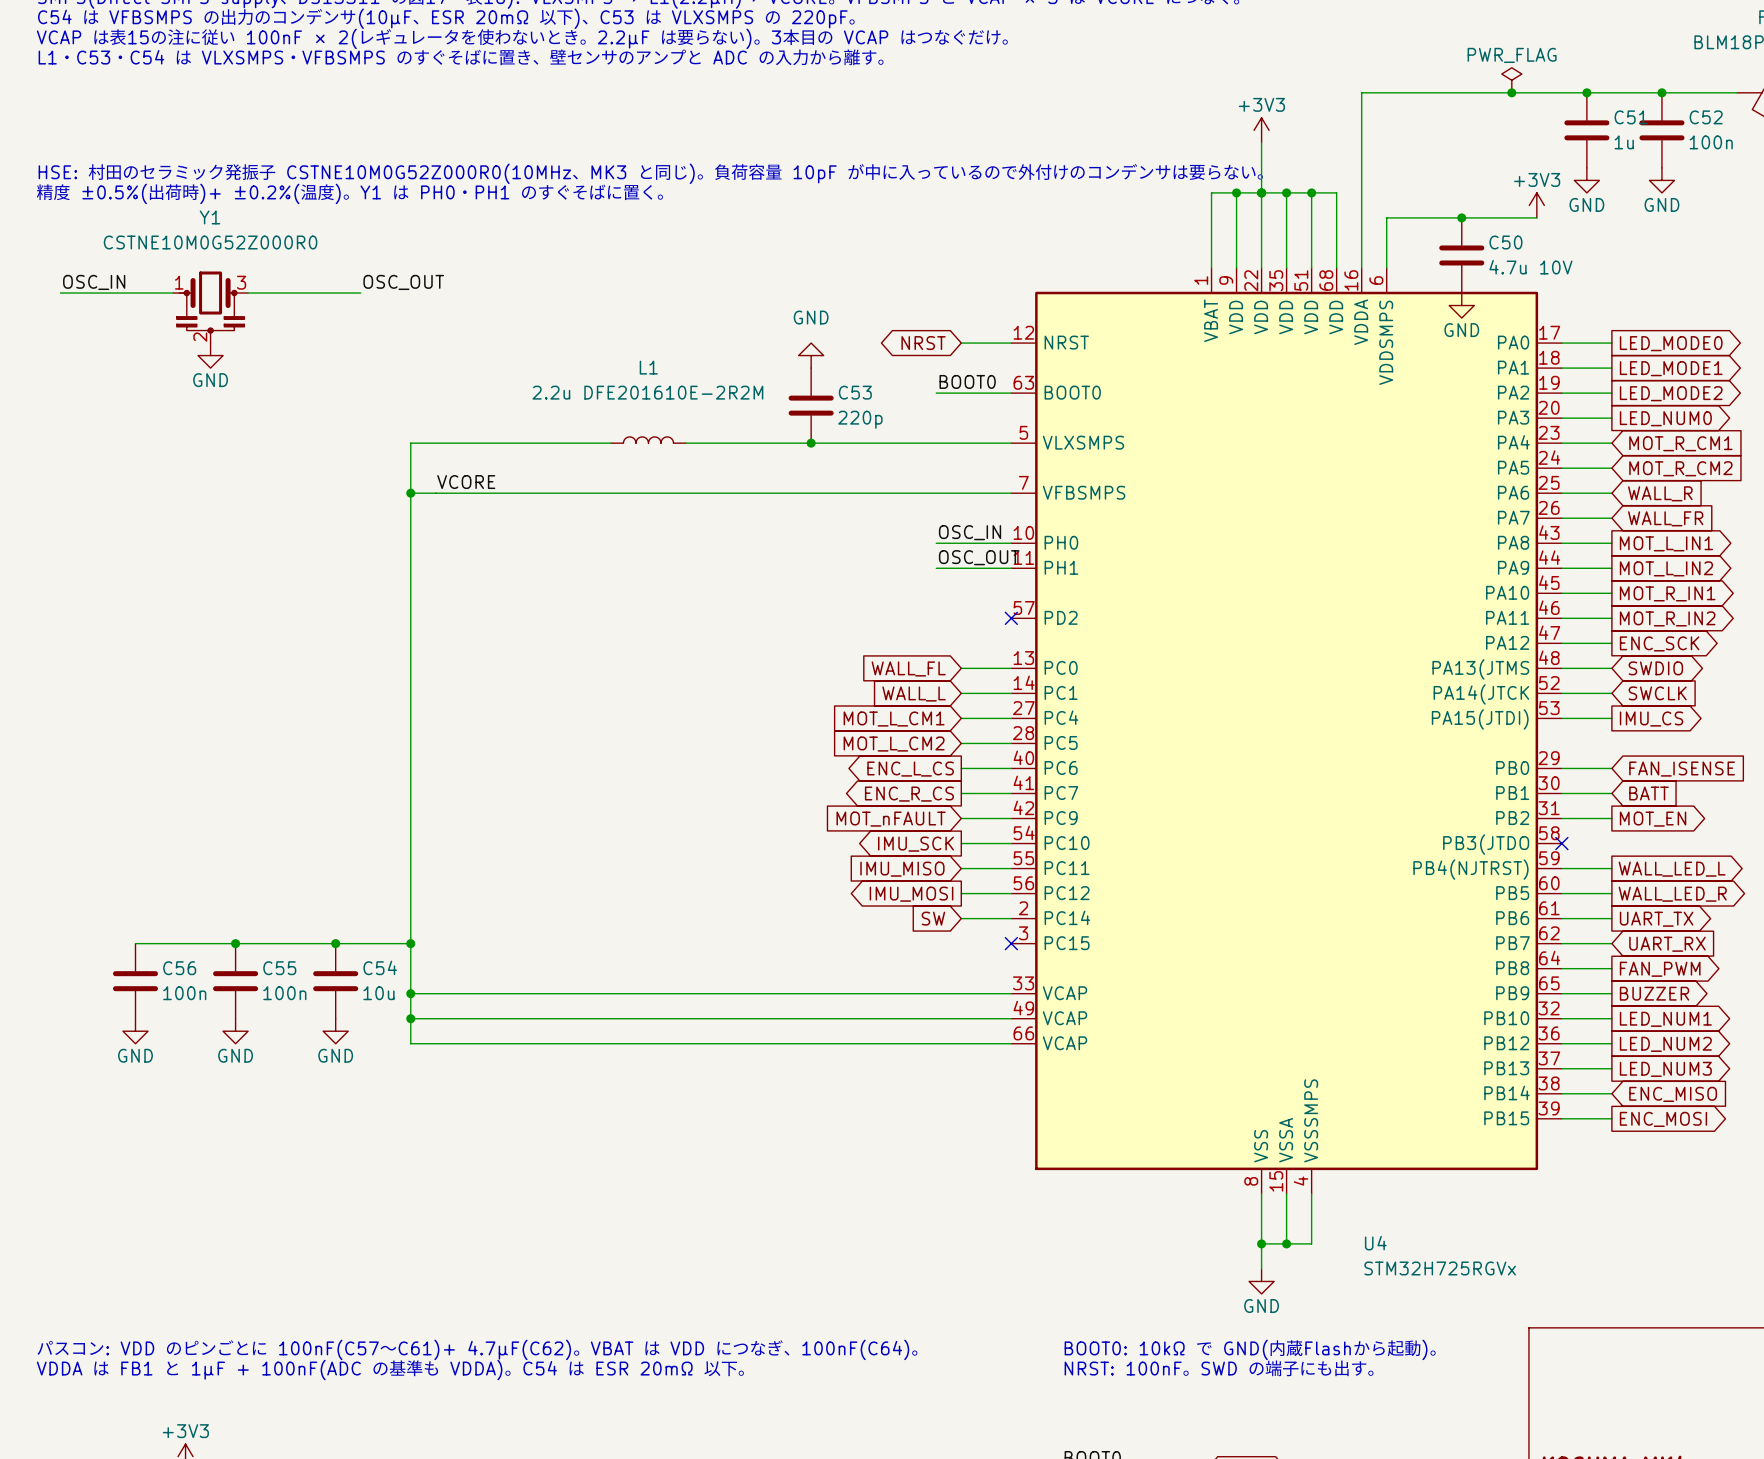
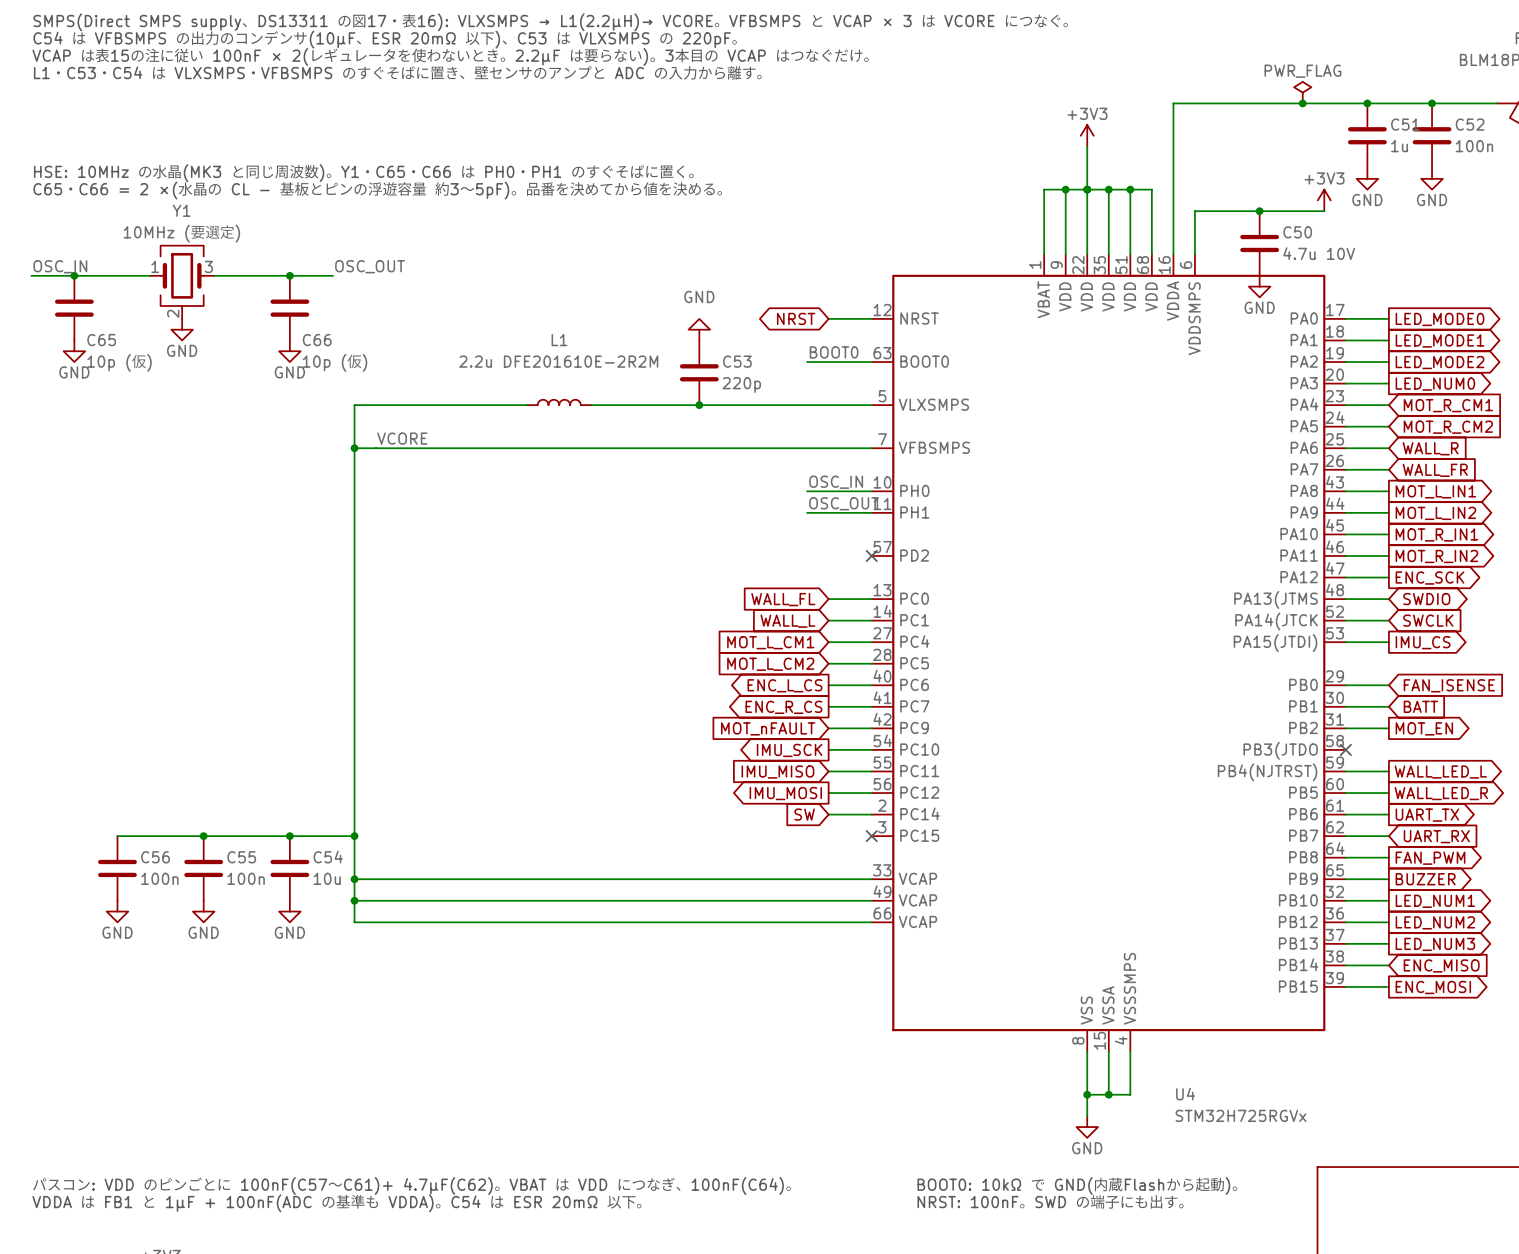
text: HSE: 村田のセラミック発振子 CSTNE10M0G52Z000R0(10MHz、MK3 と同じ)。負荷容量 10pF が中に入っているので外付けのコンデンサは要らない。 (651, 173) -> HSE: 10MHz の水晶(MK3 と同じ周波数)。Y1・C65・C66 は PH0・PH1 のすぐそばに置く。 (364, 173)
text: 精度 ±0.5%(出荷時)+ ±0.2%(温度)。Y1 は PH0・PH1 のすぐそばに置く。 (349, 193) -> C65・C66 = 2 ×(水晶の CL − 基板とピンの浮遊容量 約3〜5pF)。品番を決めてから値を決める。 (378, 190)
Y1 value: CSTNE10M0G52Z000R0 (210, 242) -> 10MHz (要選定) (181, 233)
Y1 symbol: [173, 271, 249, 344] -> [149, 245, 215, 319]
label position: OSC_IN (94, 282) -> OSC_IN (60, 266)
label position: OSC_OUT (403, 282) -> OSC_OUT (370, 266)
wire: none -> (31, 275) (52, 275)
junction: none -> (74, 275)
junction: none -> (289, 275)
wire: none -> (311, 275) (332, 275)
C65: none -> 10p (仮) (74, 308)
C66: none -> 10p (仮) (289, 308)
power symbol: none -> GND (74, 351)
power symbol: none -> GND (289, 351)

